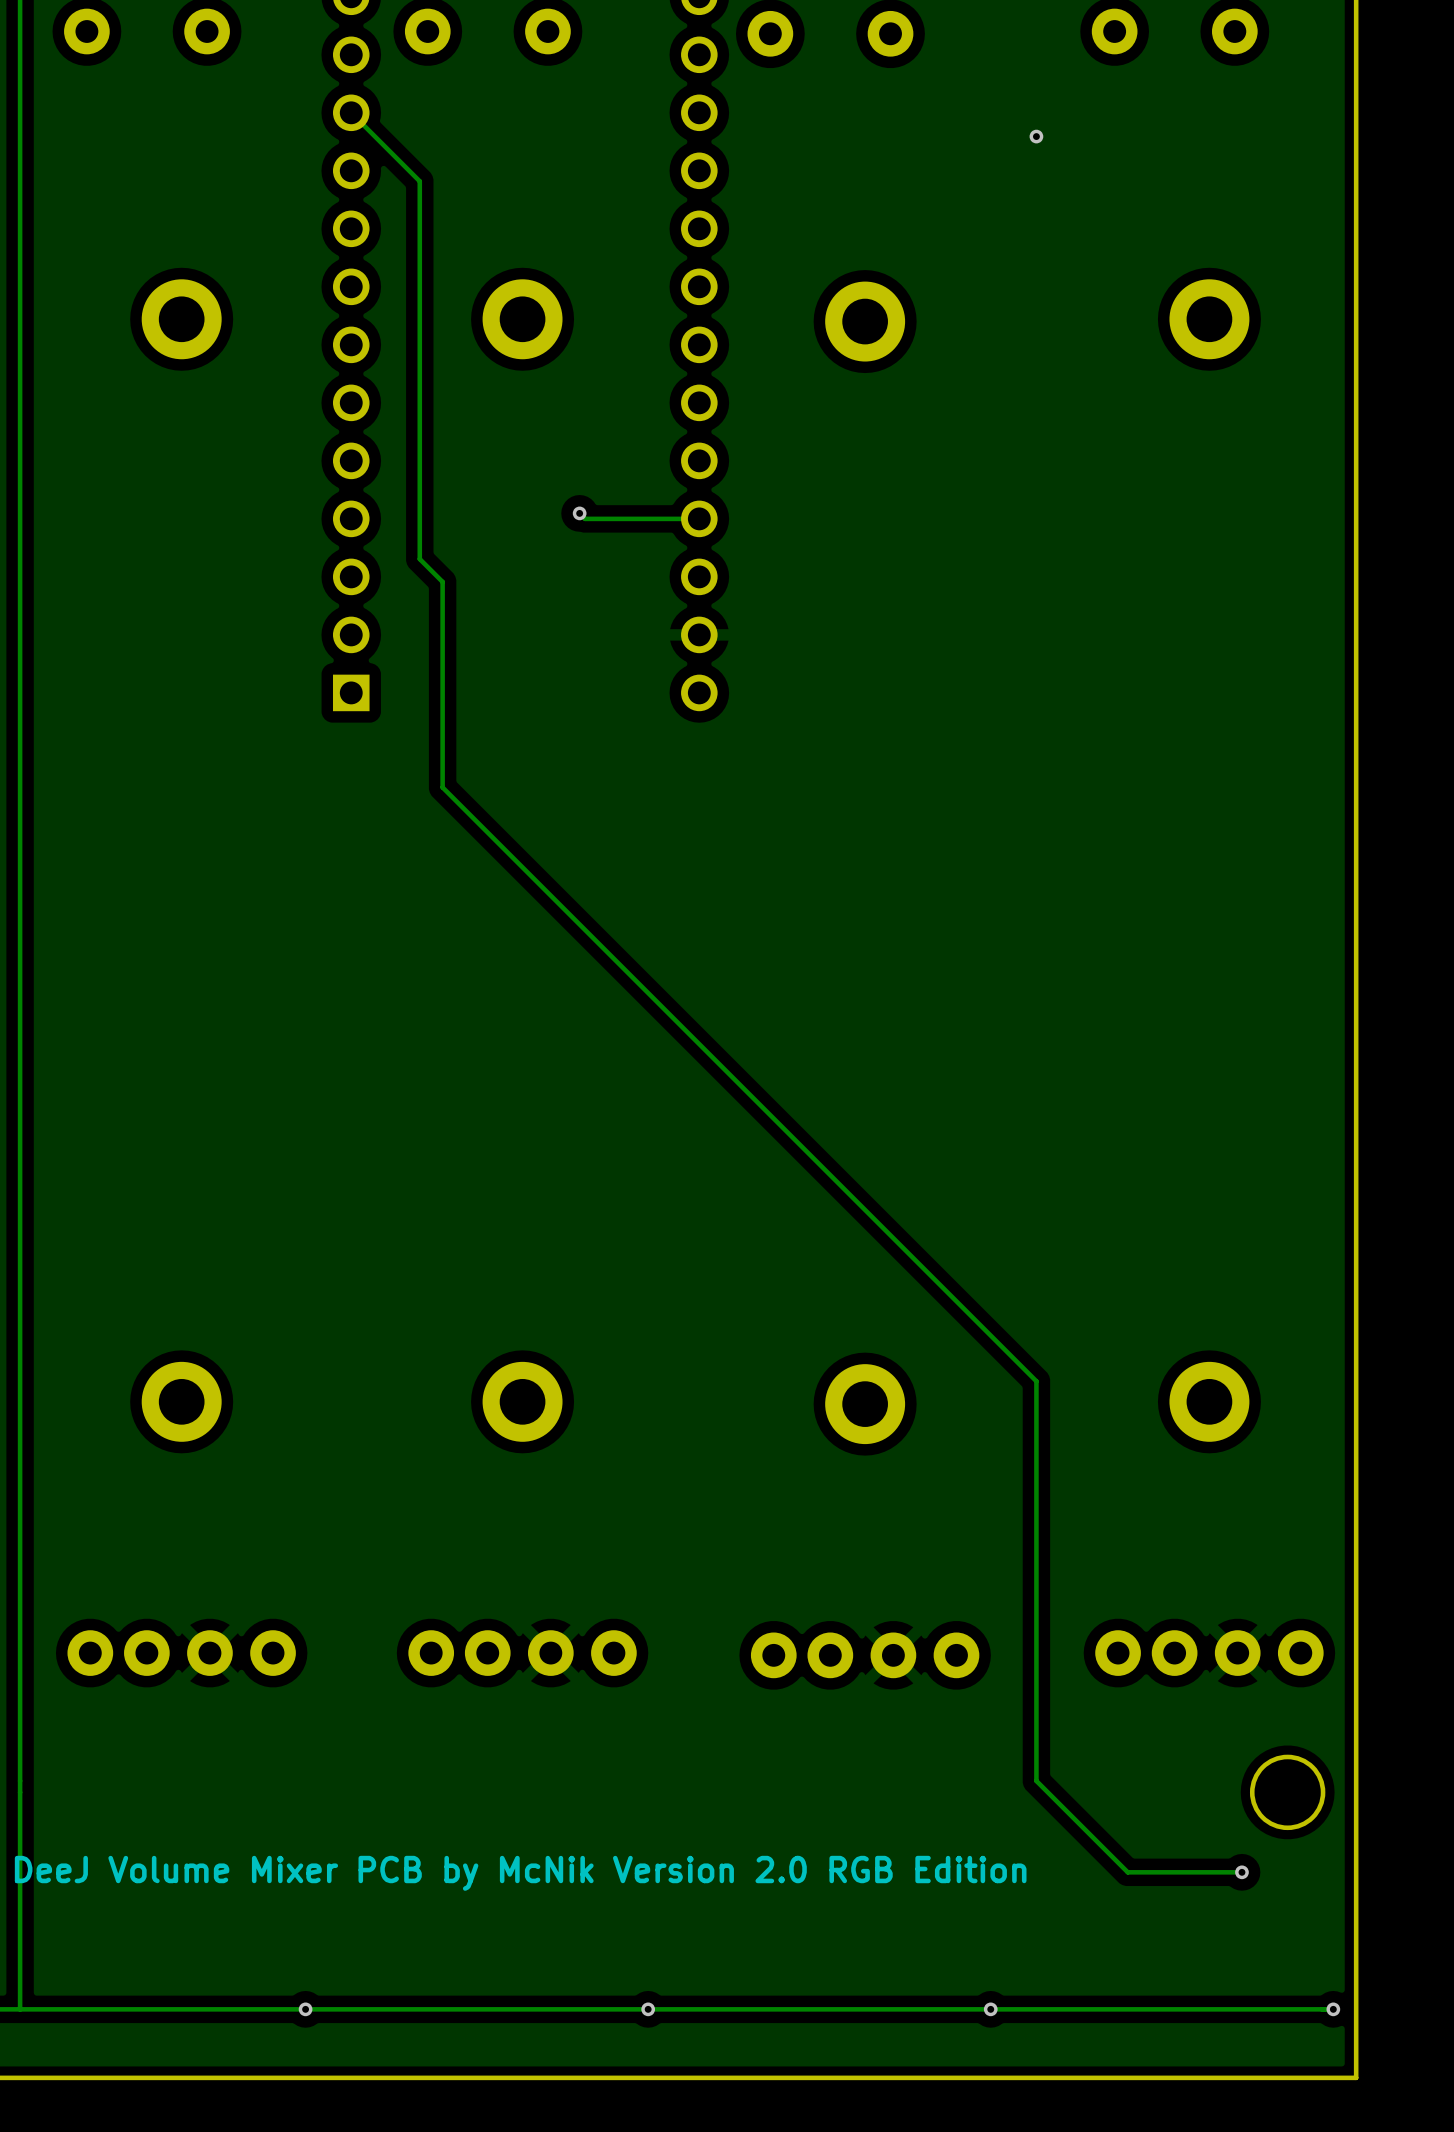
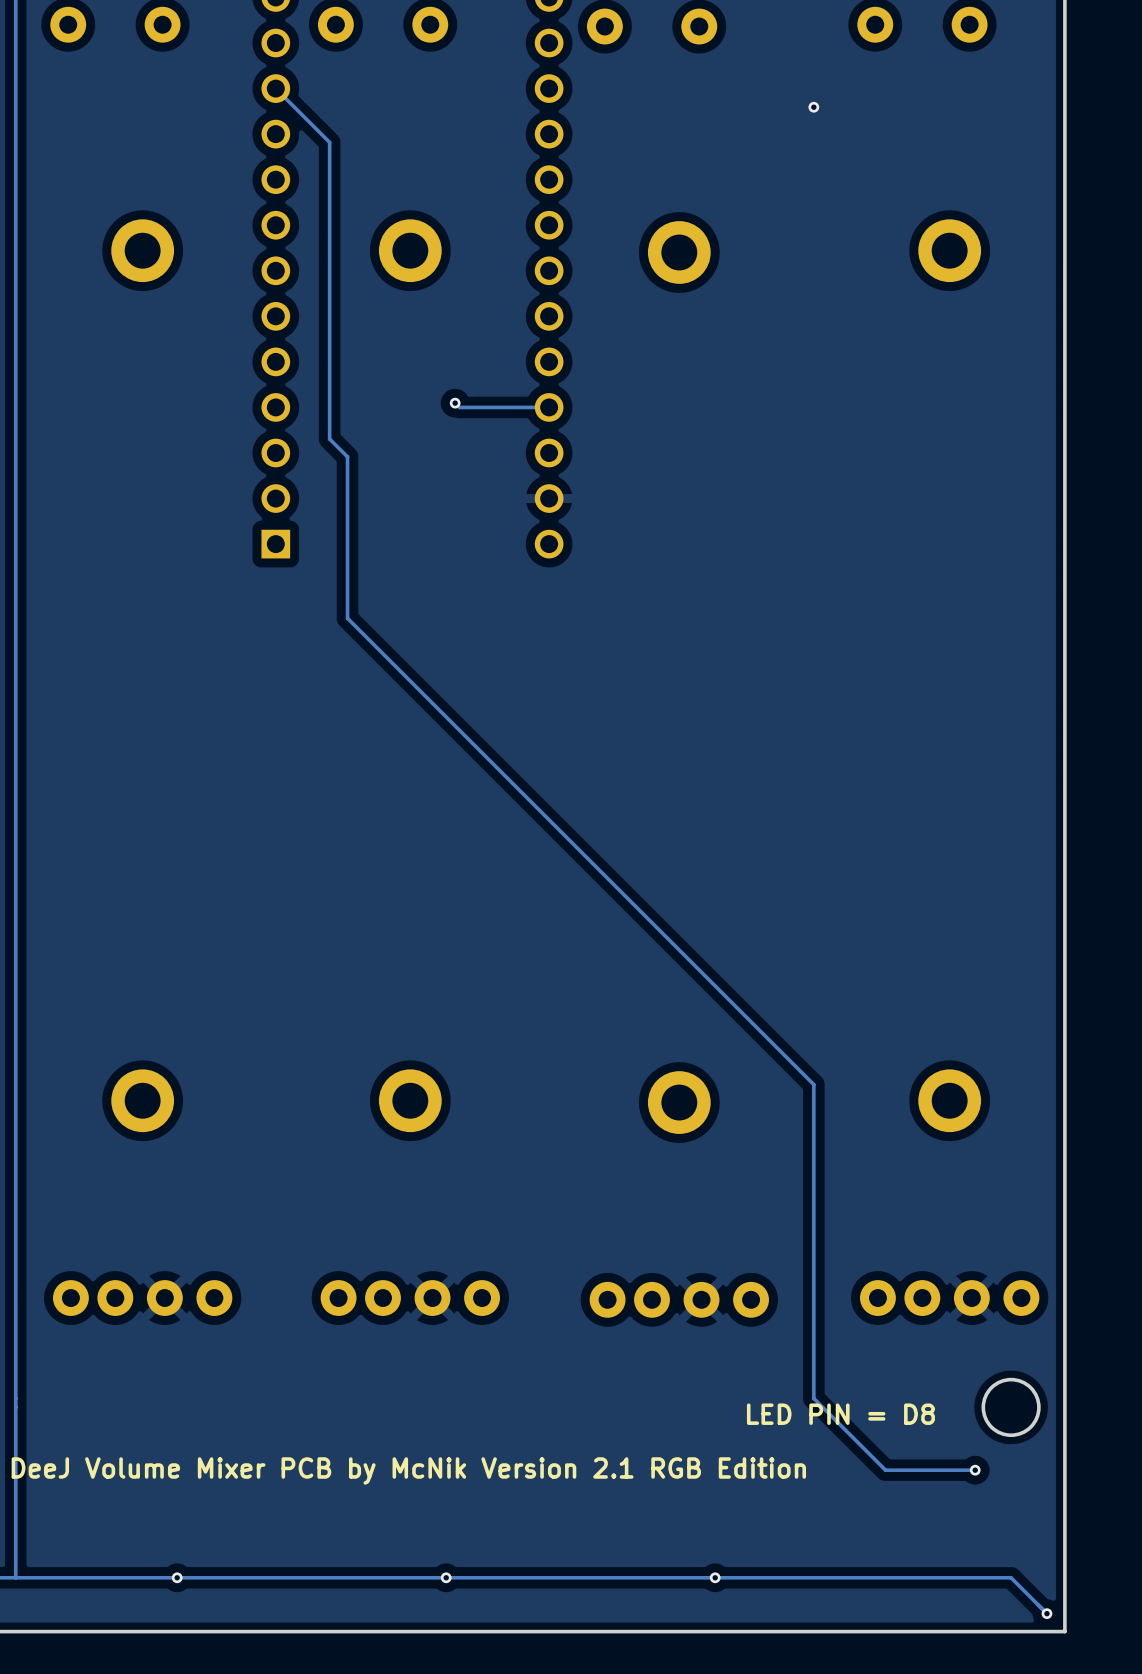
text: none -> LED PIN = D8 (840, 1414)
text: DeeJ Volume Mixer PCB by McNik Version 2.0 RGB Edition (520, 1873) -> DeeJ Volume Mixer PCB by McNik Version 2.1 RGB Edition (408, 1470)
via position: (305, 2009) -> (177, 1577)
via position: (648, 2009) -> (446, 1577)
via position: (990, 2009) -> (715, 1577)
track: (1333, 2009) (1287, 2009) -> (1046, 1613) (1011, 1577)
via position: (1333, 2009) -> (1046, 1613)

